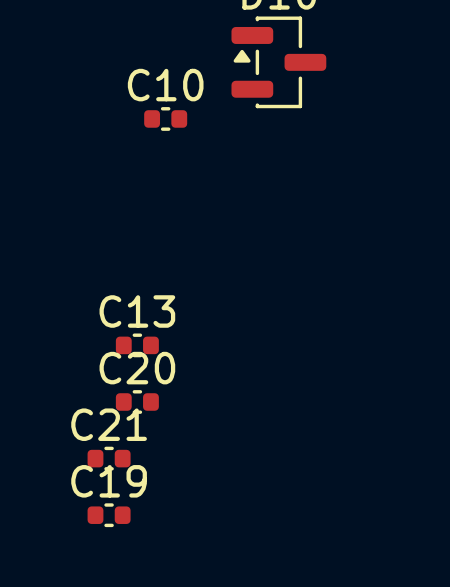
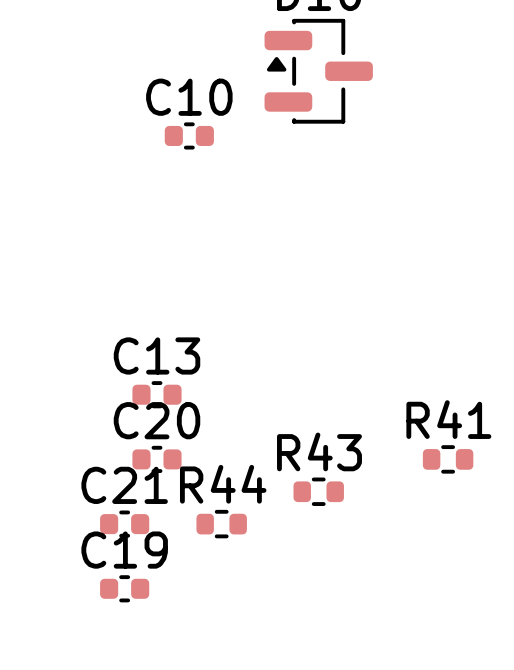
R41: none -> (448, 459)
R43: none -> (318, 491)
R44: none -> (221, 524)

